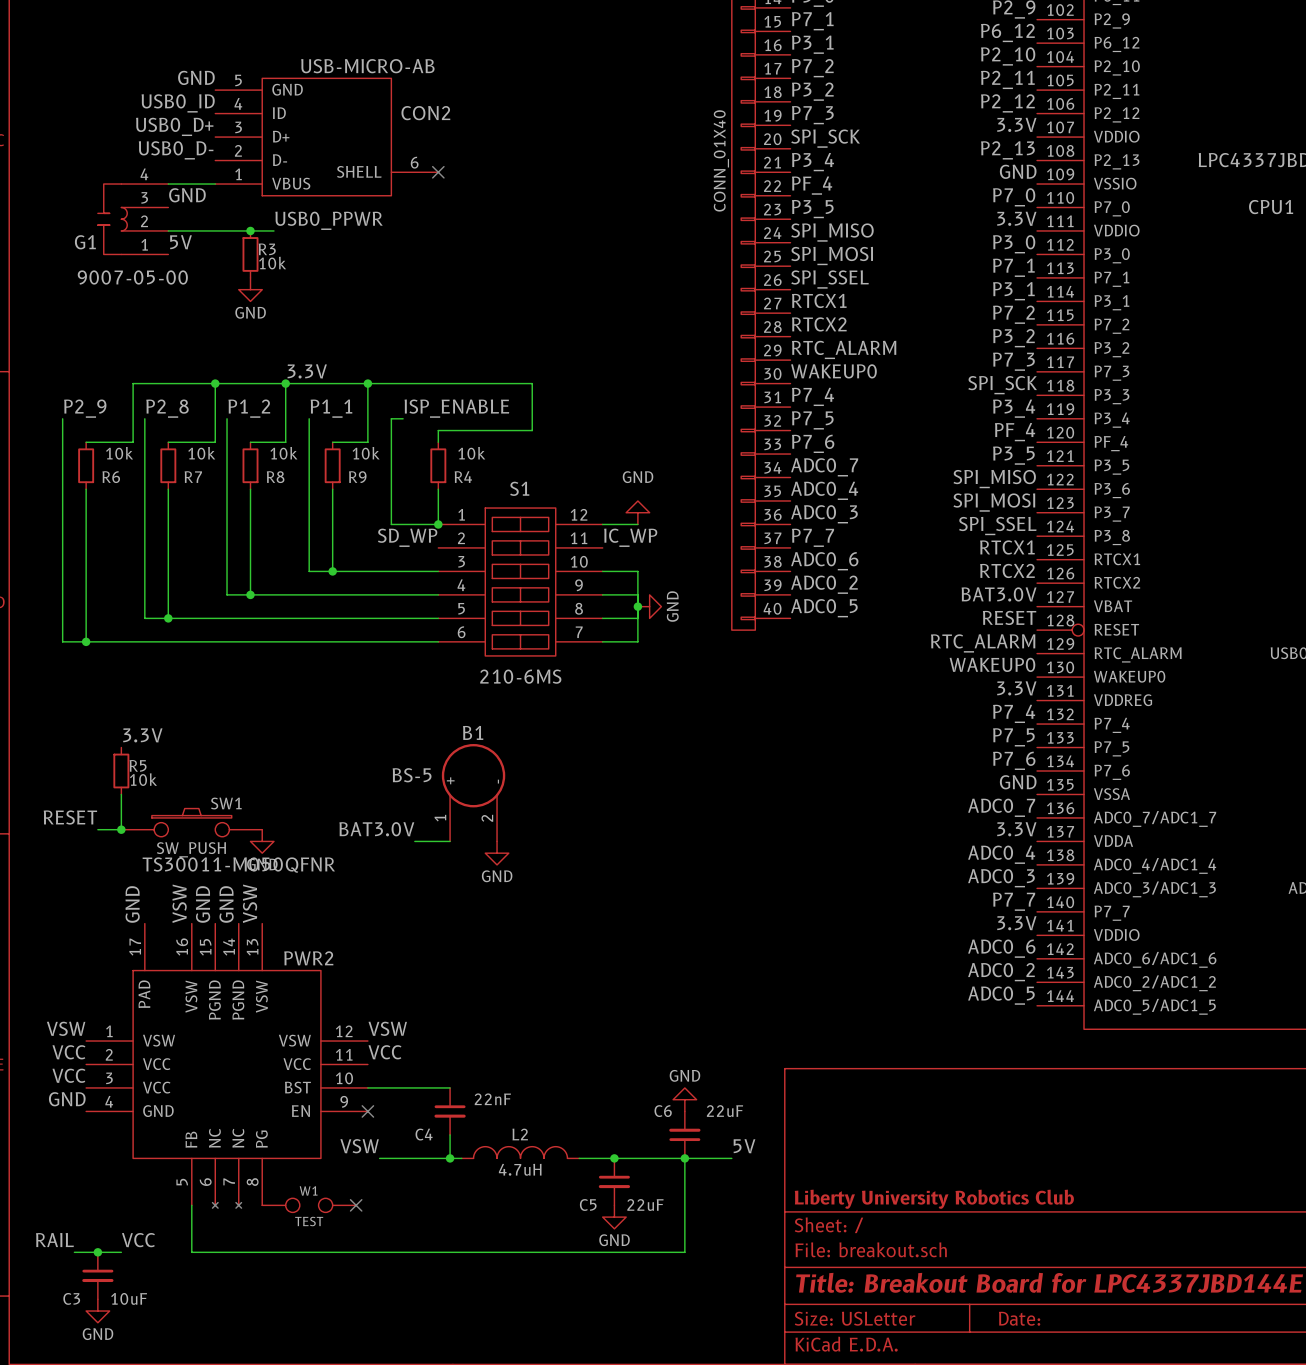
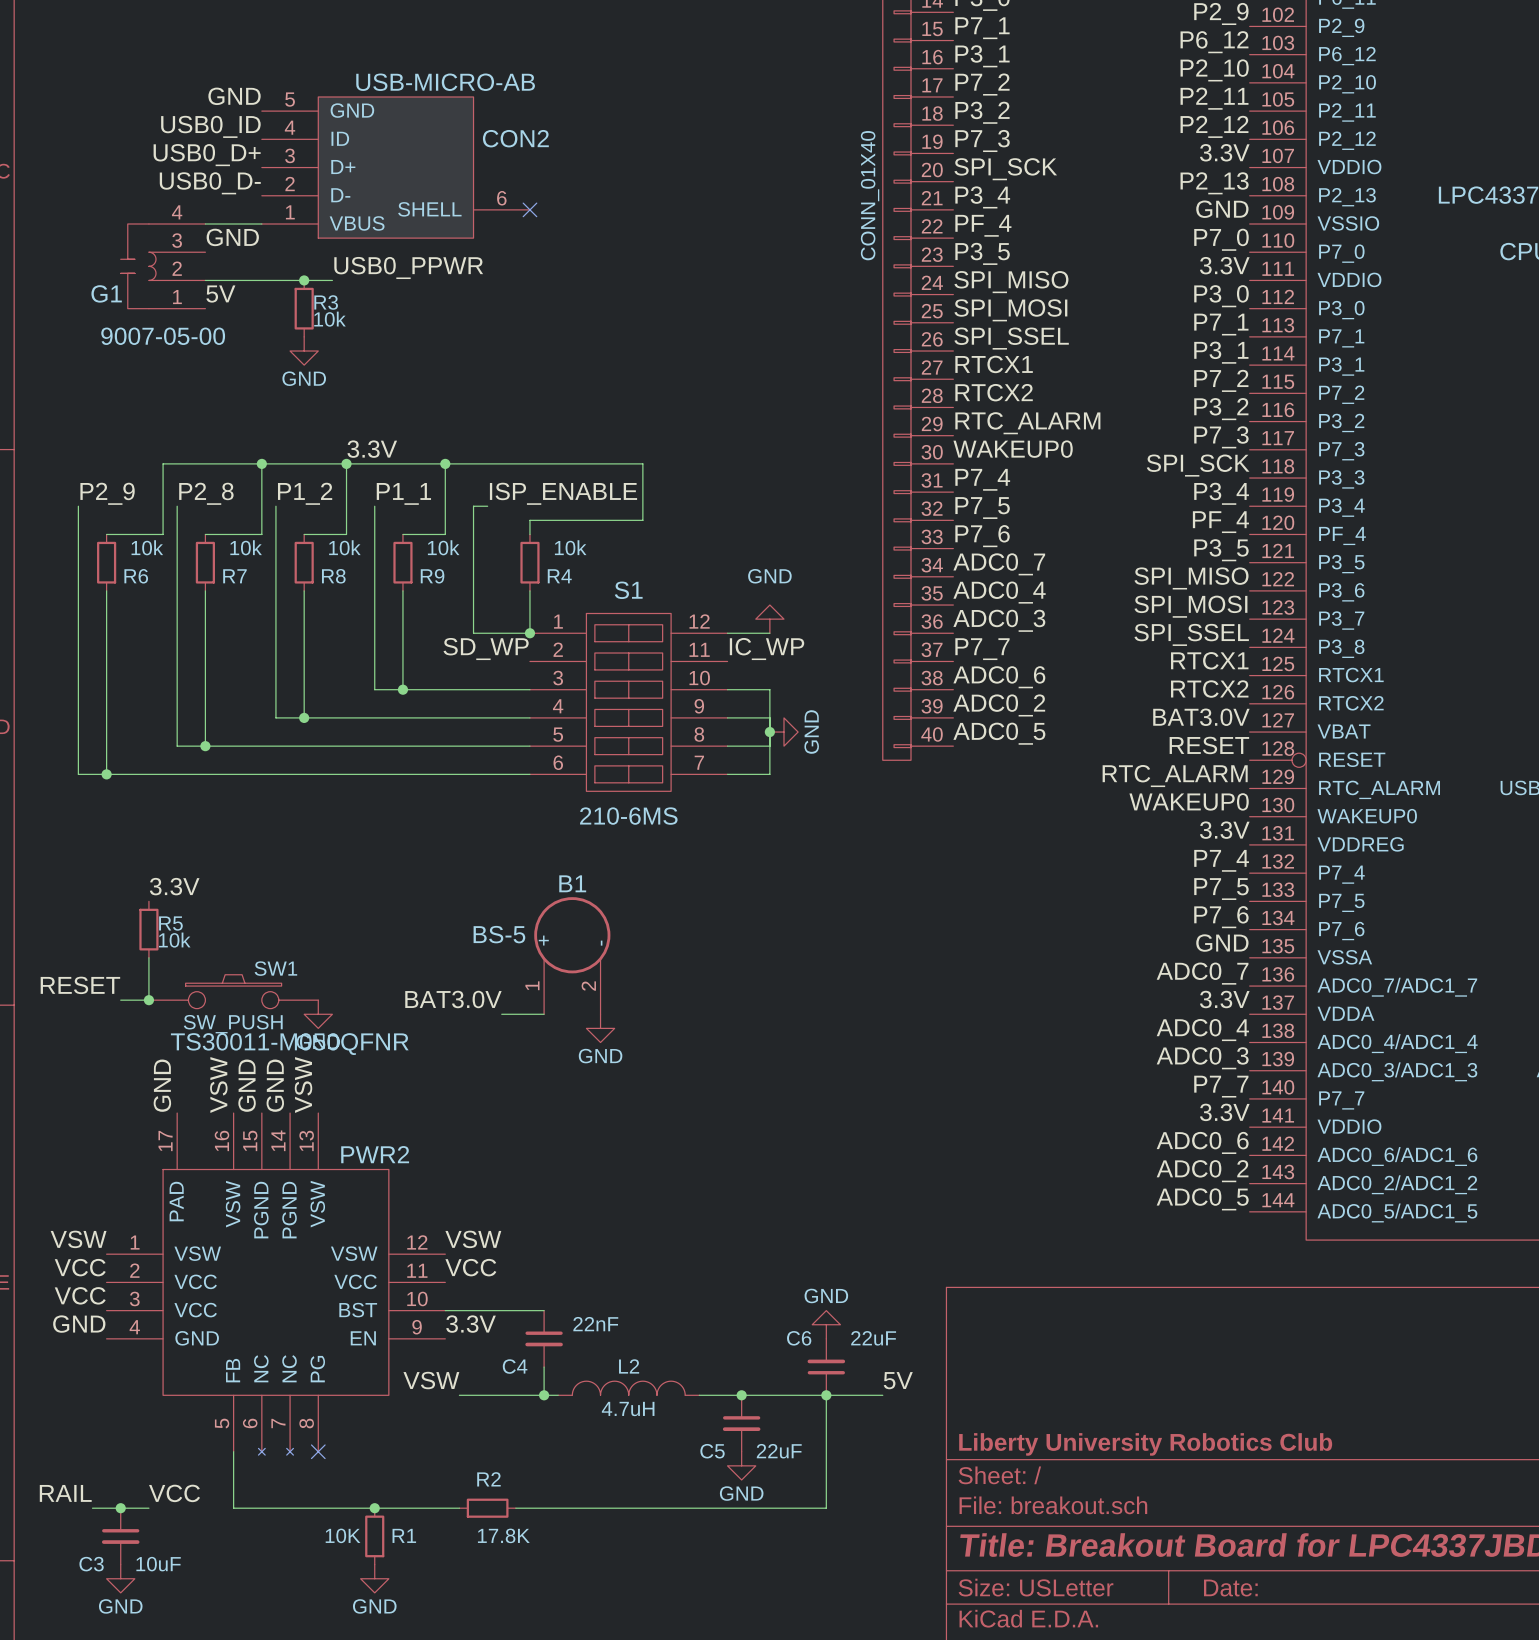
label: none -> 3.3V (471, 1324)
no-connect mark: (367, 1111) -> none
no-connect mark: none -> (318, 1451)
W1: TEST (309, 1205) -> none
no-connect mark: (356, 1205) -> none
junction: none -> (374, 1508)
wire: (379, 1252) (426, 1252) -> none
R2: none -> 17.8K (487, 1508)
R1: none -> 10K (374, 1536)
power symbol: none -> GND (374, 1578)

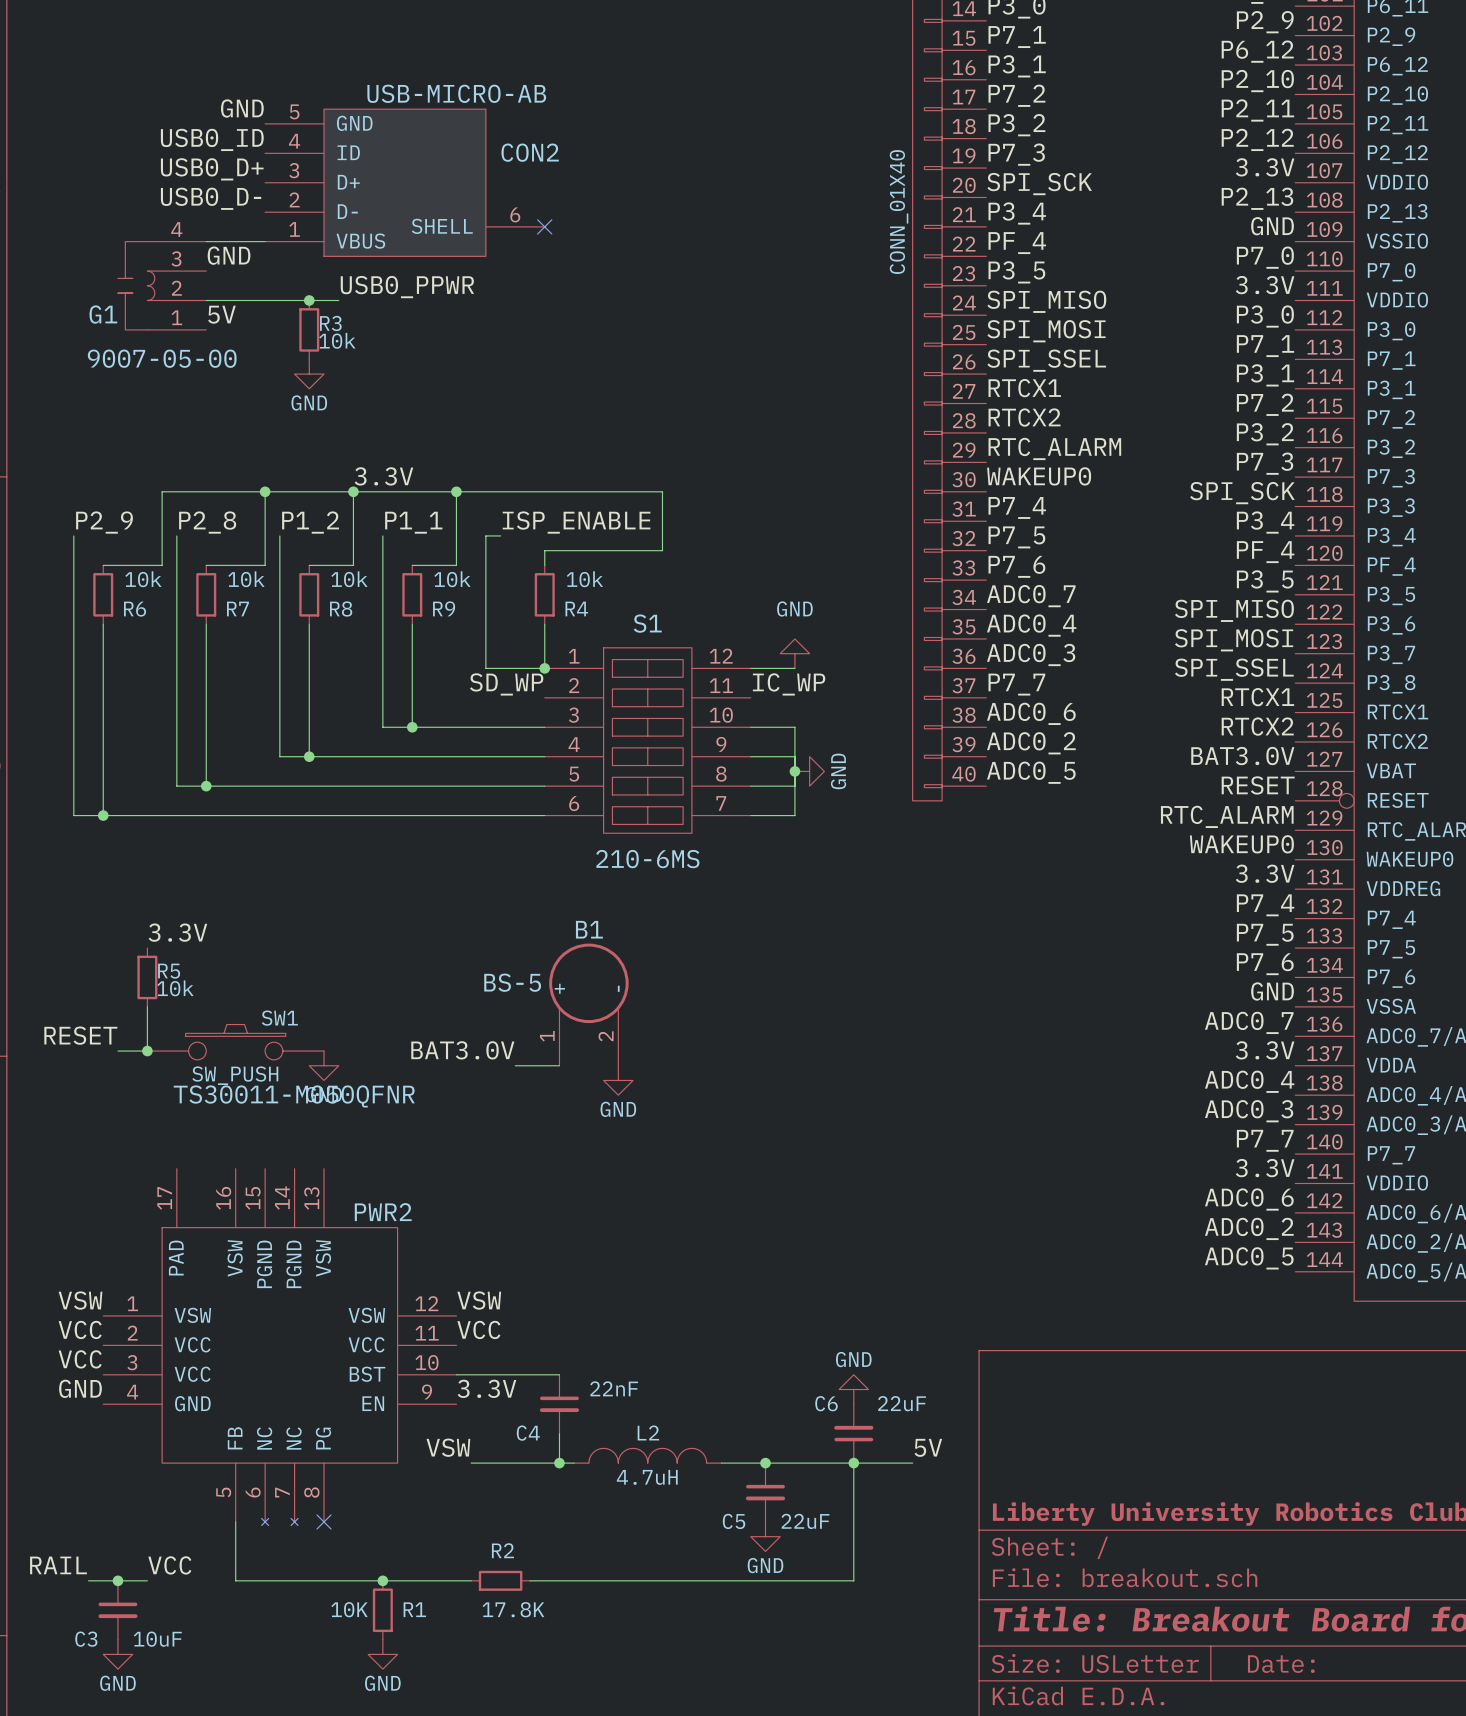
label: GND (162, 1085) -> none
label: VSW (218, 1085) -> none
label: GND (247, 1085) -> none
label: GND (275, 1085) -> none
label: VSW (303, 1085) -> none

